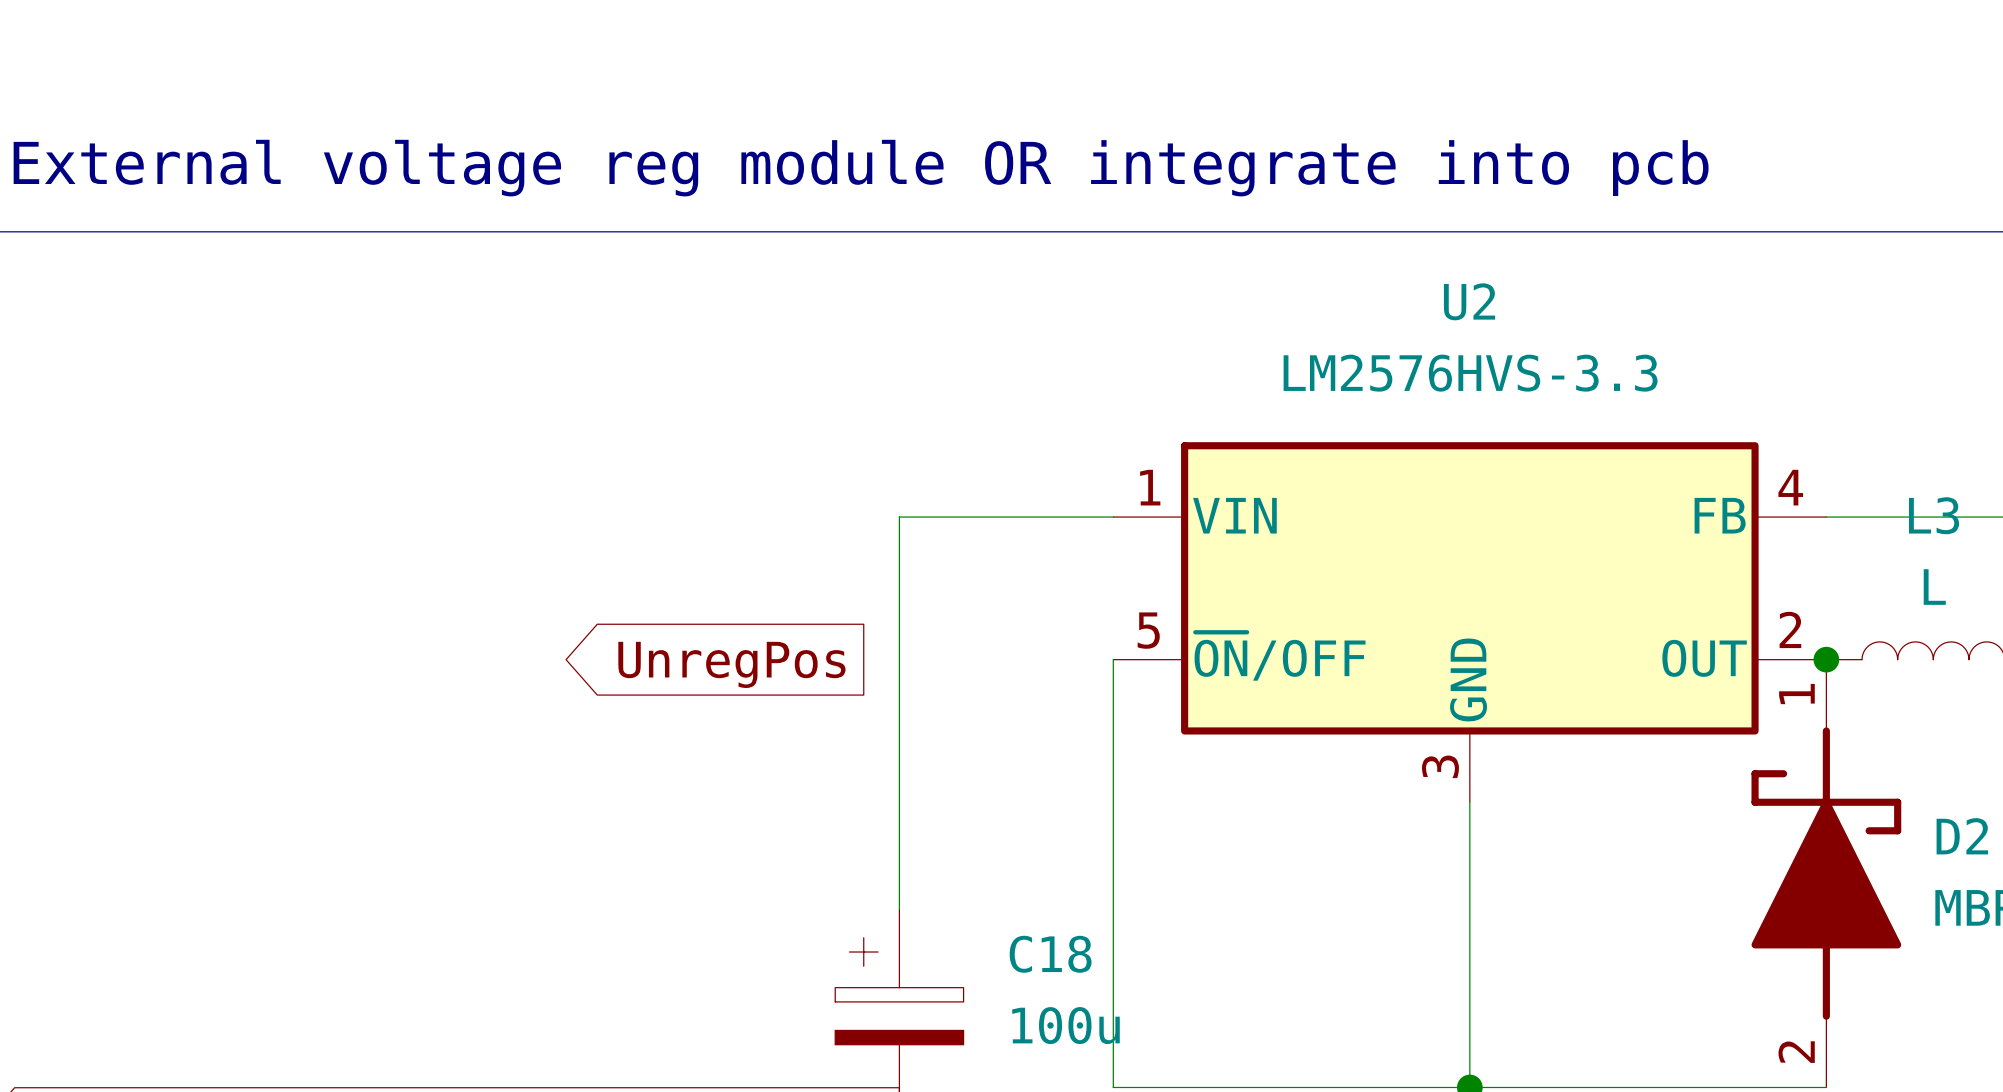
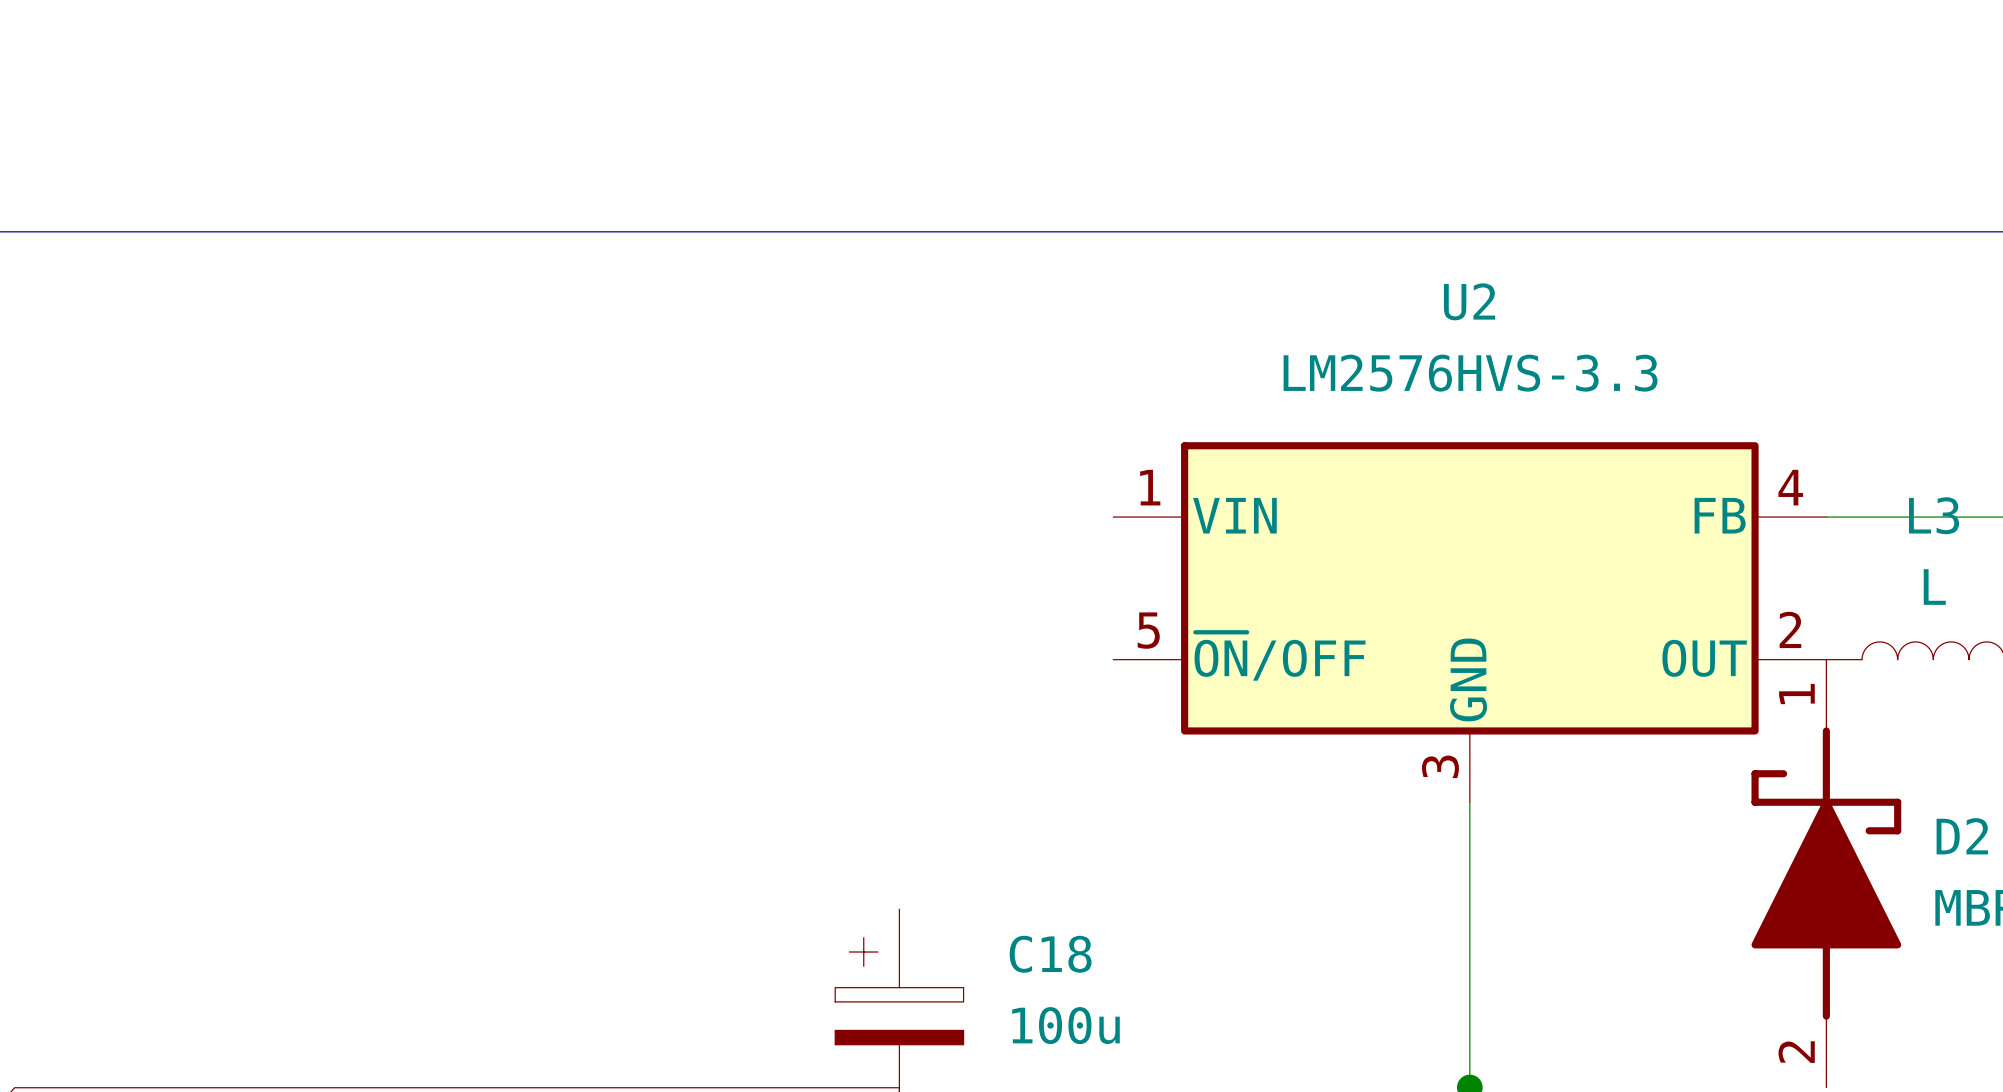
text: External voltage reg module OR integrate into pcb (861, 168) -> none
wire: (1113, 517) (899, 517) (899, 909) -> none
wire: (1113, 659) (1113, 1087) (1826, 1087) -> none
junction: (1826, 659) -> none
global label: UnregPos (731, 664) -> none

